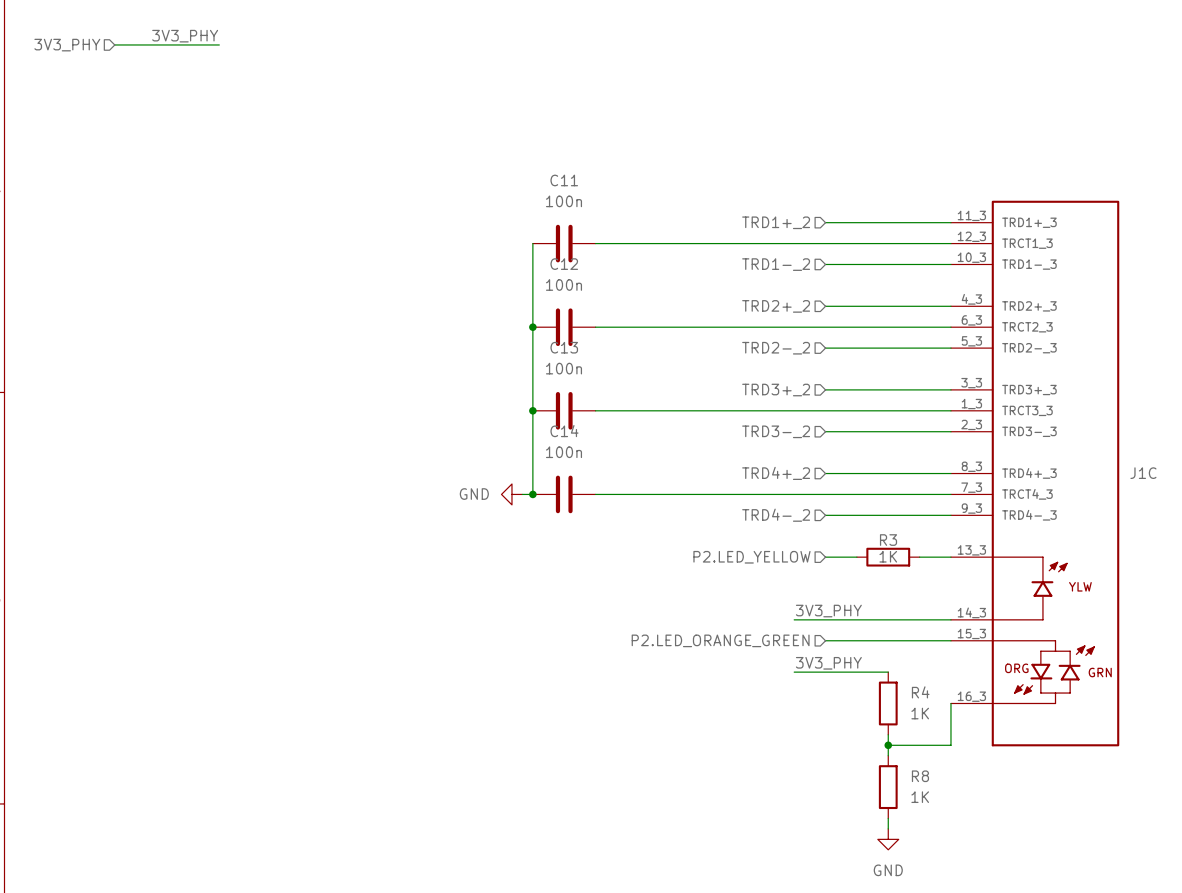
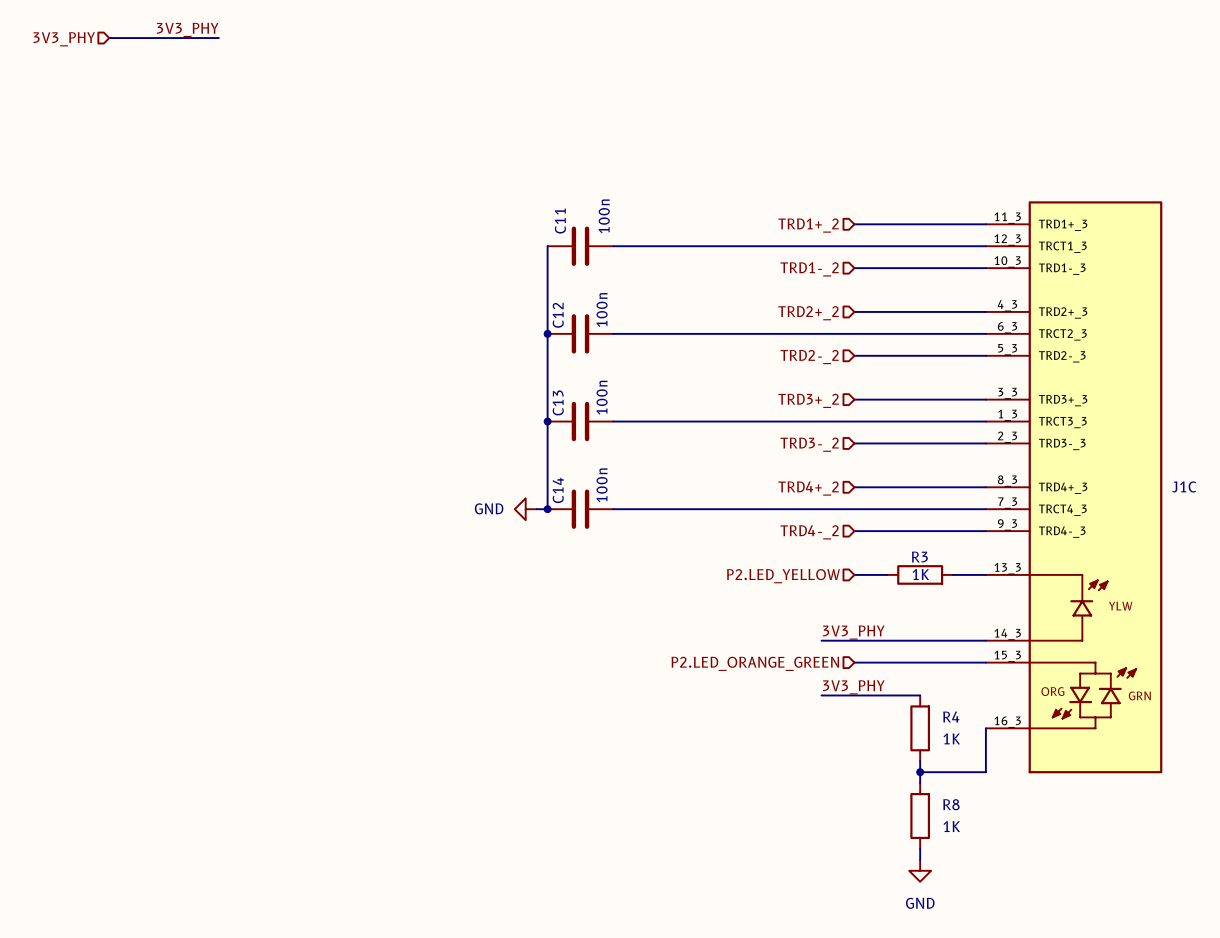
C11 name rotation: 0° (564, 180) -> 90° counterclockwise (560, 221)
C11 name position: C11 (564, 180) -> C11 (560, 221)
C11 value rotation: 0° (563, 201) -> 90° counterclockwise (604, 216)
C12 name rotation: 0° (564, 264) -> 90° counterclockwise (558, 315)
C12 name position: C12 (564, 264) -> C12 (558, 315)
C12 value rotation: 0° (563, 284) -> 90° counterclockwise (602, 310)
C13 name rotation: 0° (564, 347) -> 90° counterclockwise (558, 402)
C13 name position: C13 (564, 347) -> C13 (558, 402)
C13 value rotation: 0° (563, 368) -> 90° counterclockwise (602, 397)
C14 name rotation: 0° (564, 431) -> 90° counterclockwise (558, 490)
C14 name position: C14 (564, 431) -> C14 (558, 490)
C14 value rotation: 0° (563, 452) -> 90° counterclockwise (602, 485)

